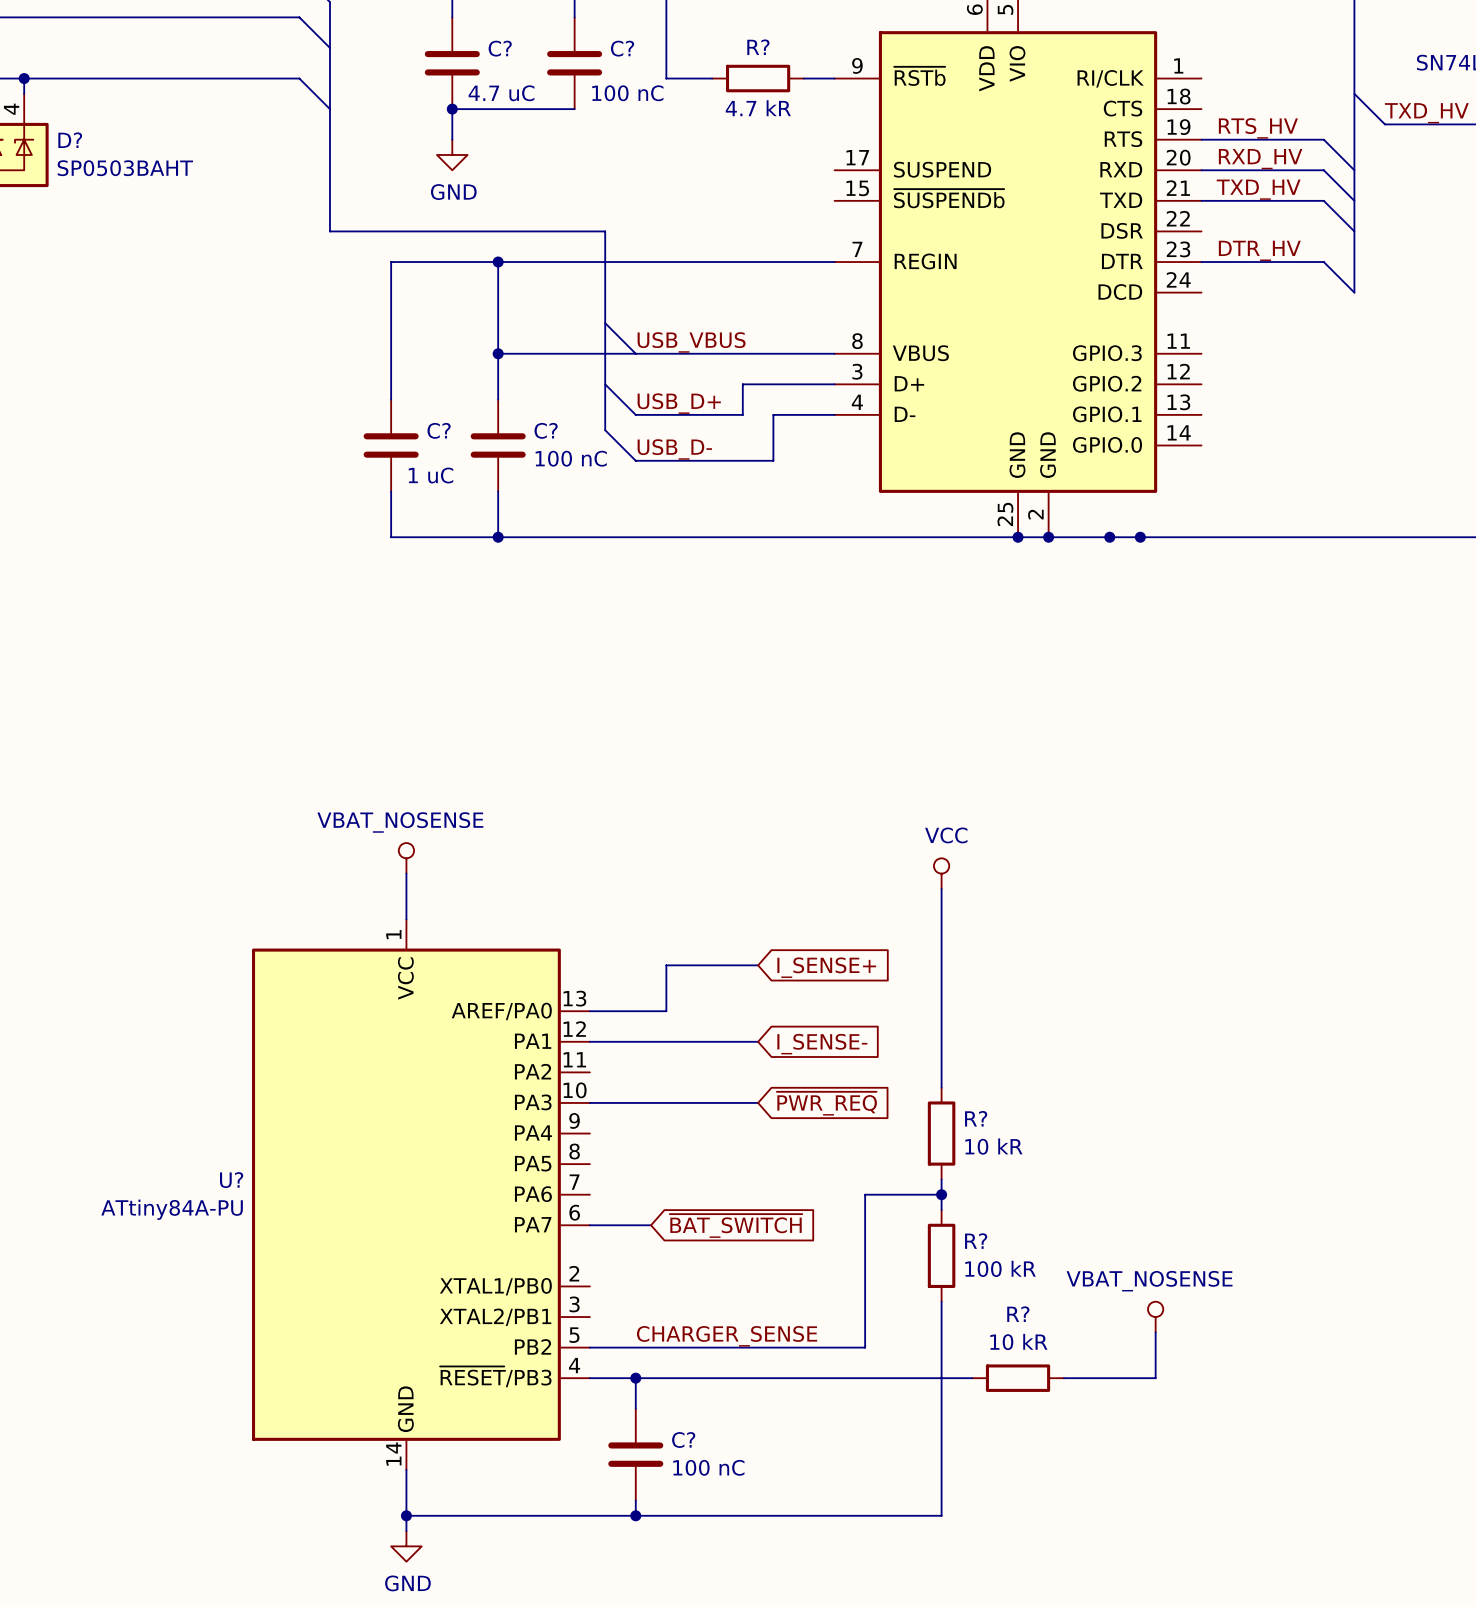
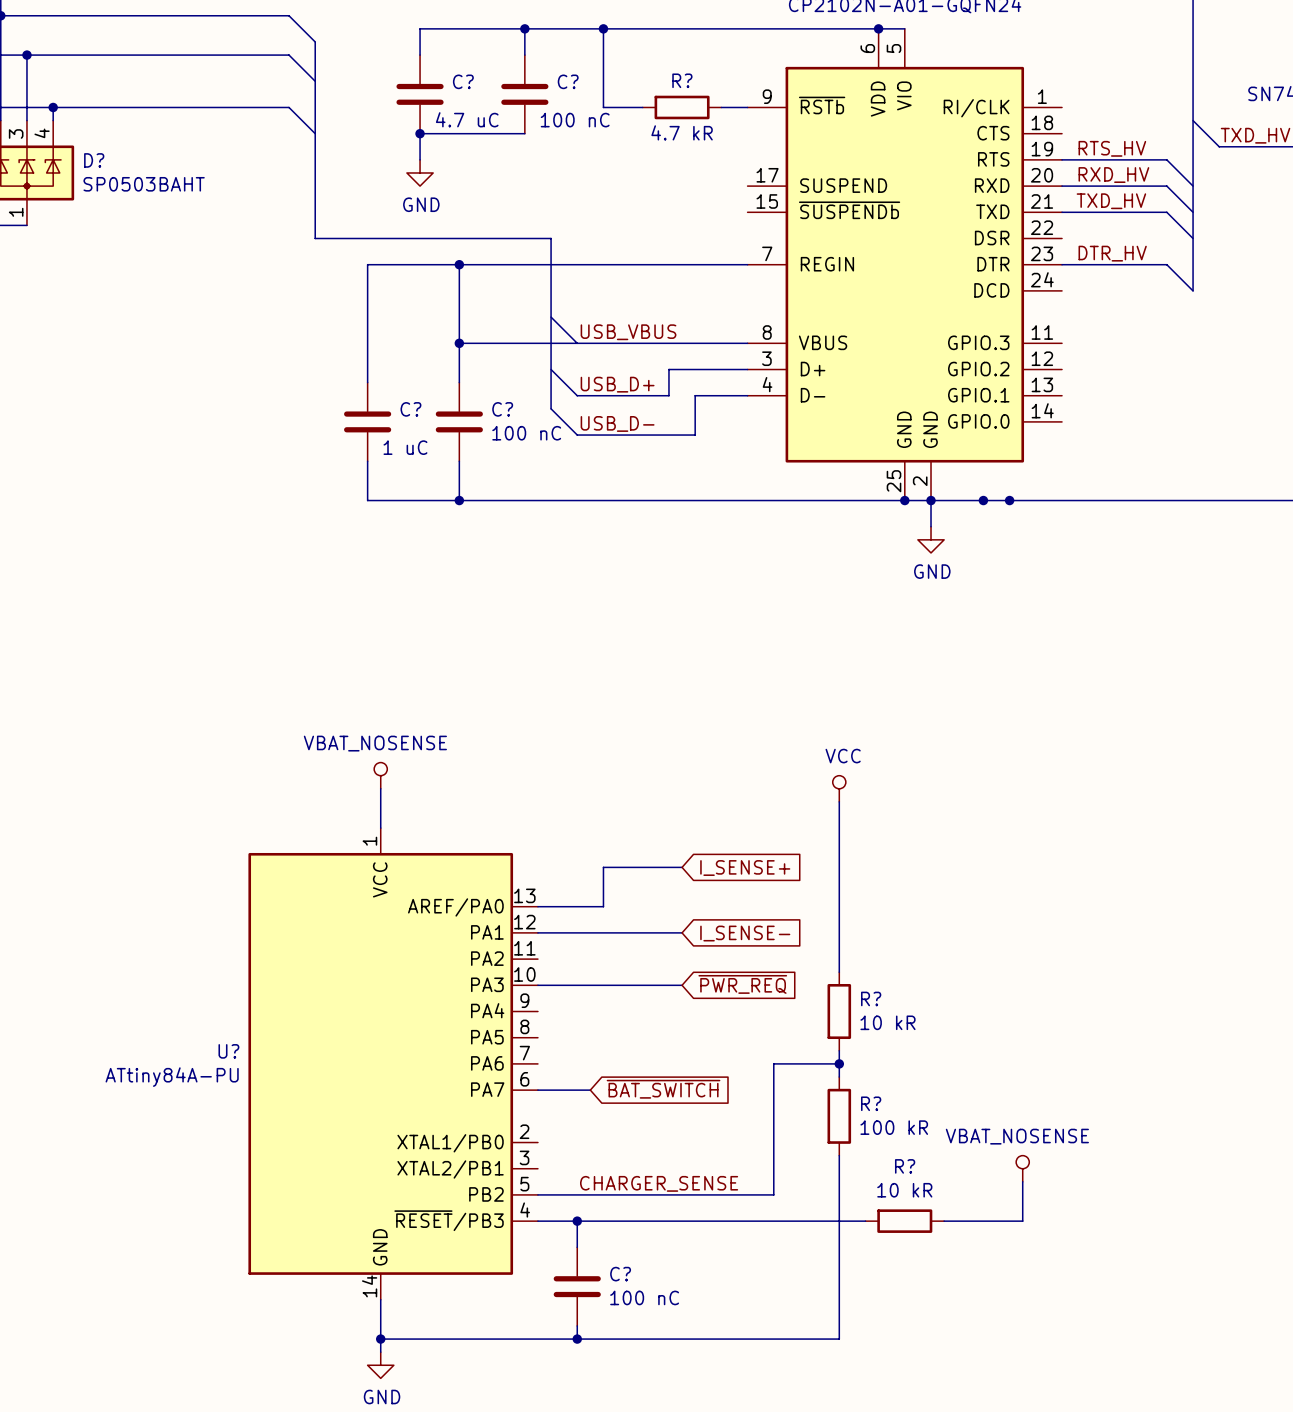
wire: none -> (931, 500) (931, 526)
power symbol: none -> GND (931, 539)

